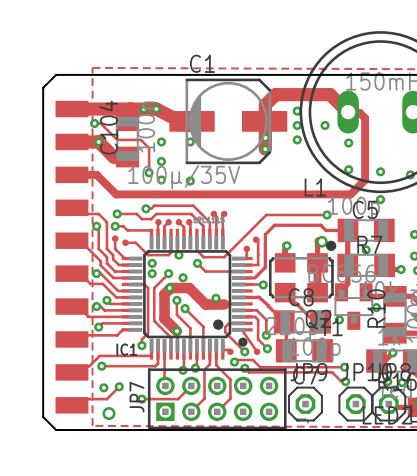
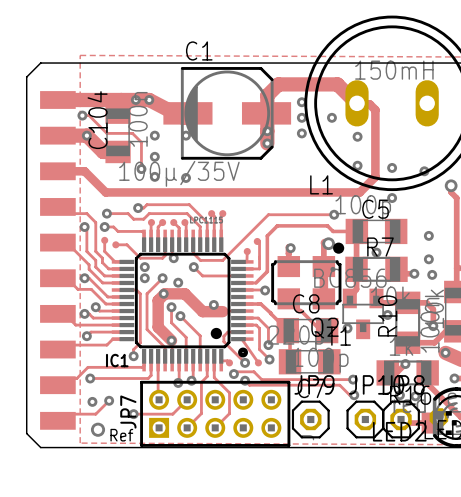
text: none -> Ref (121, 435)

